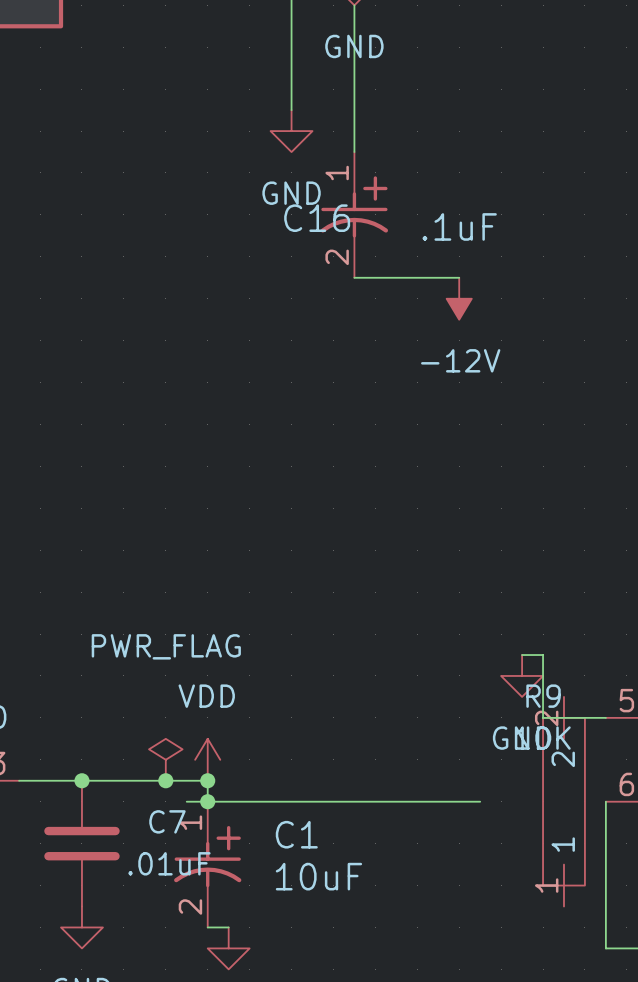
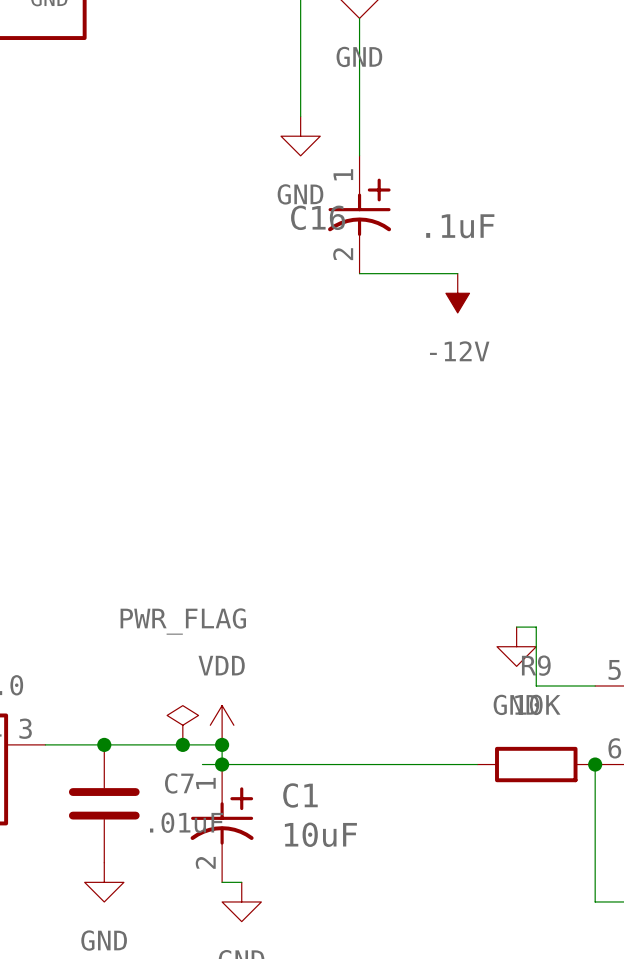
R9 symbol: [543, 696, 585, 907] -> [477, 746, 596, 783]
junction: none -> (595, 764)

